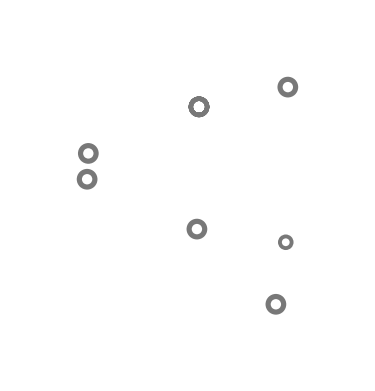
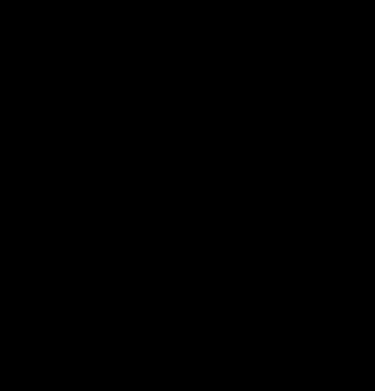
via: (287, 87) -> none
via: (198, 106) -> none
via: (88, 153) -> none
via: (87, 179) -> none
via: (196, 229) -> none
via: (285, 242) -> none
via: (275, 304) -> none

